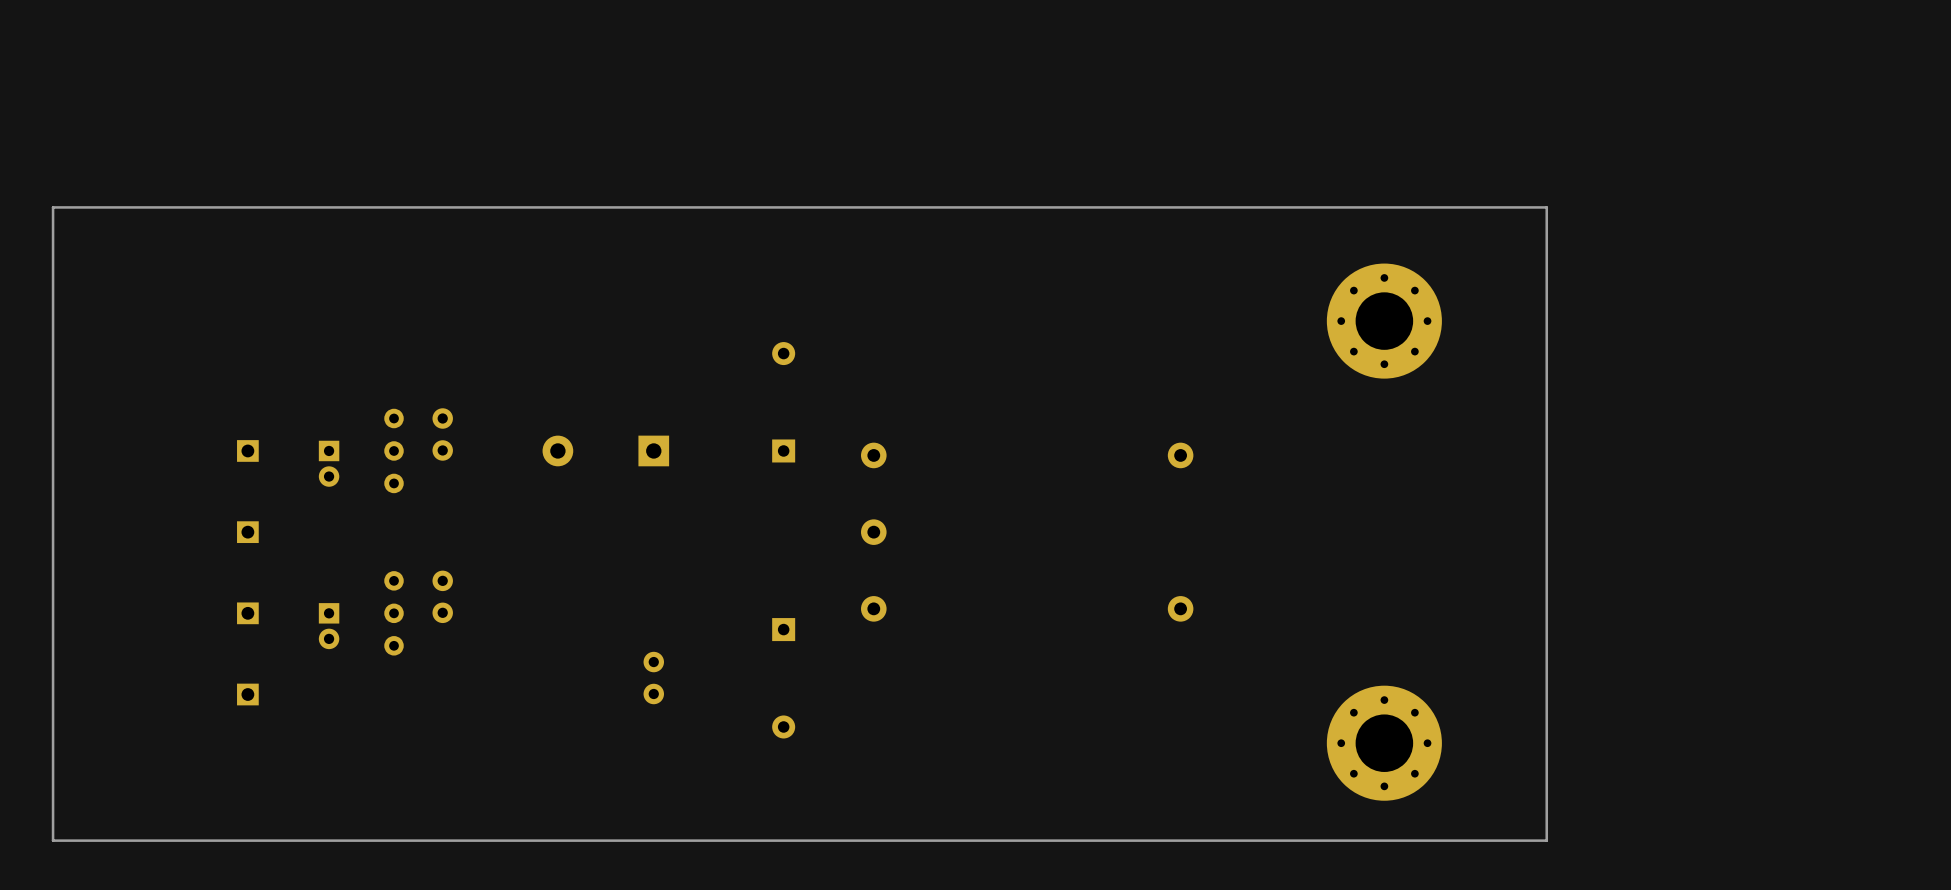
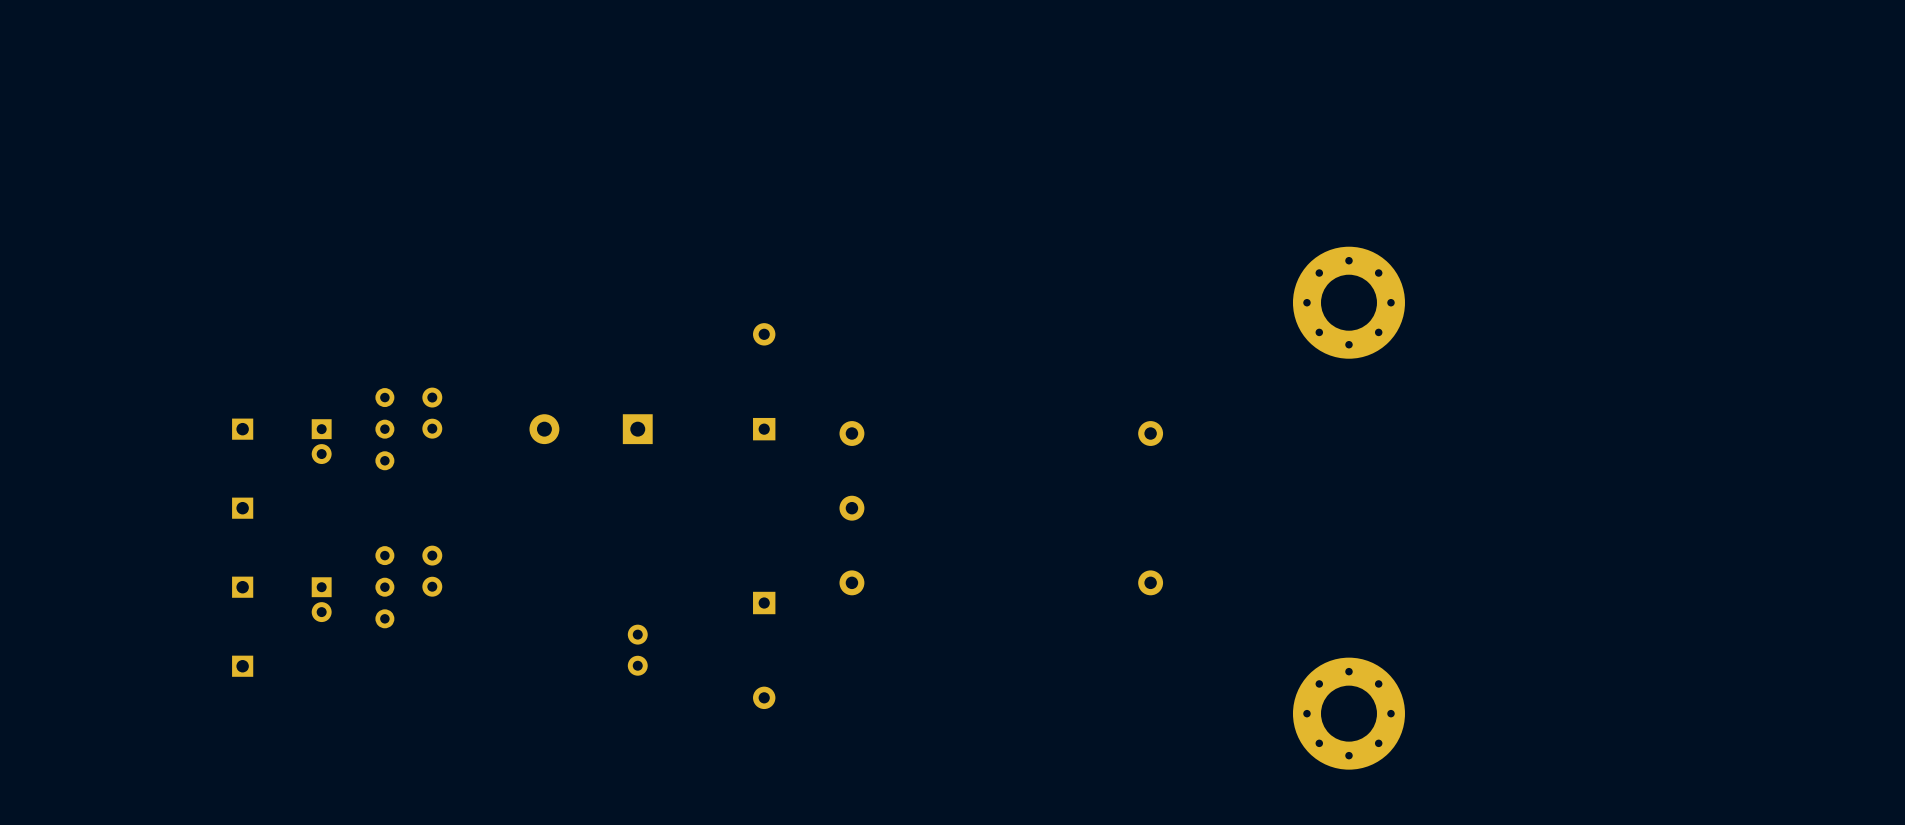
board edge: (1546, 207) (53, 207) (53, 840) (1546, 840) (1546, 207) -> none

